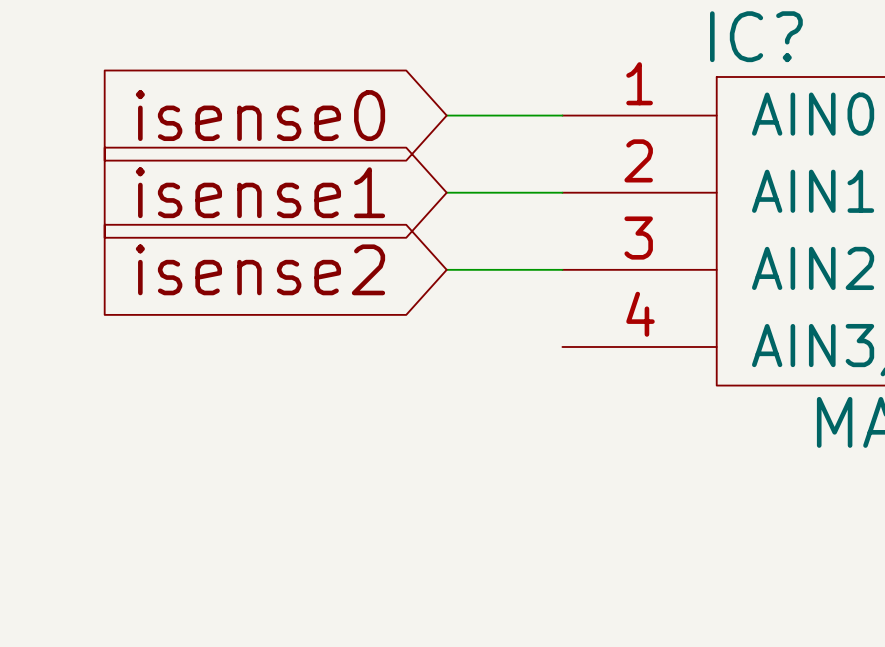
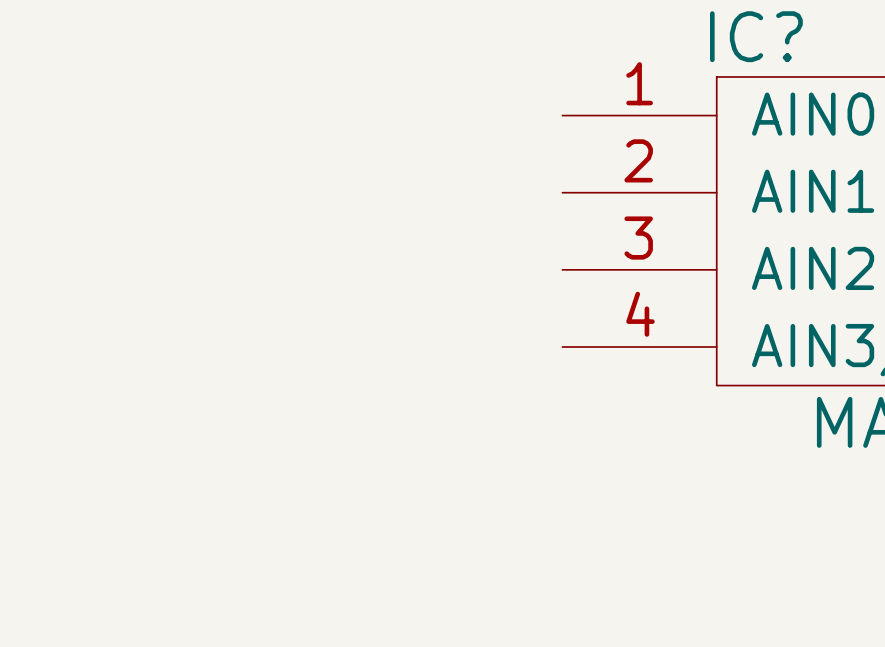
global label: isense0 (260, 115) -> none
wire: (446, 115) (562, 115) -> none
global label: isense1 (260, 192) -> none
wire: (446, 192) (562, 192) -> none
global label: isense2 (260, 269) -> none
wire: (446, 269) (562, 269) -> none

